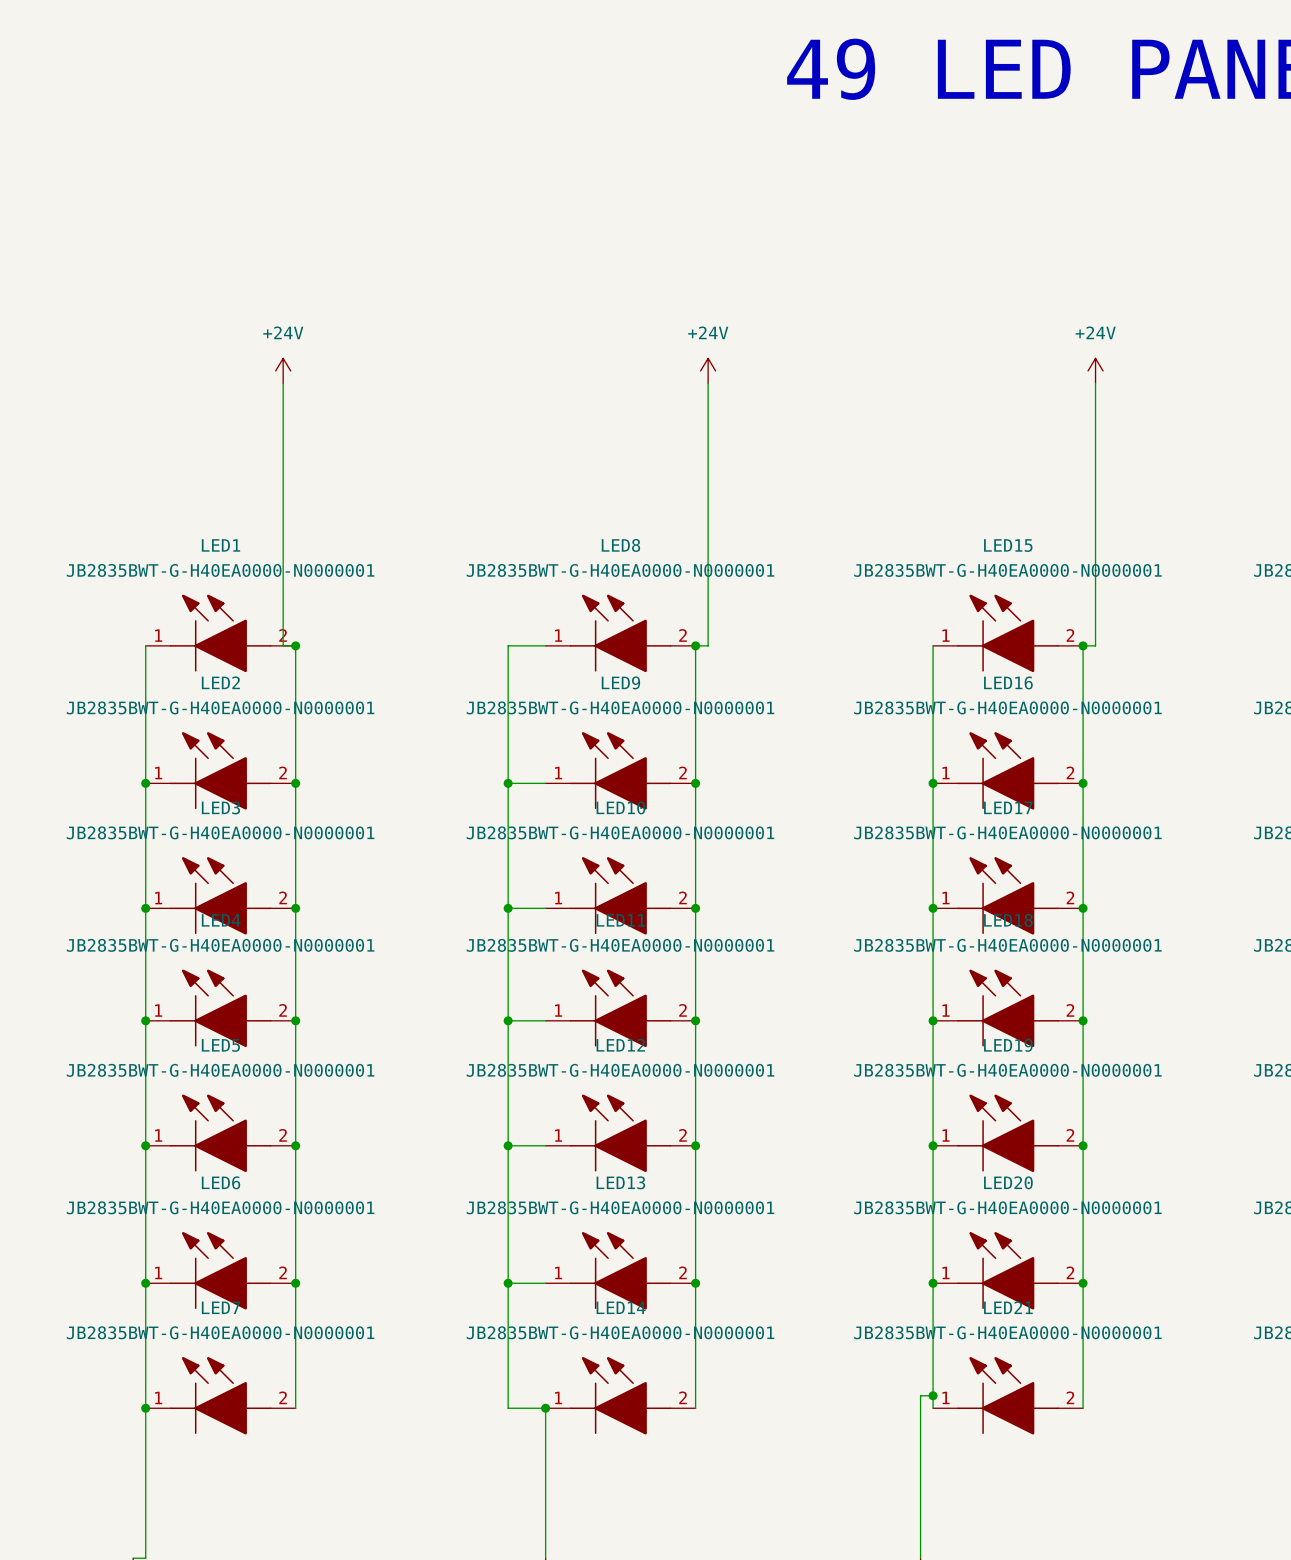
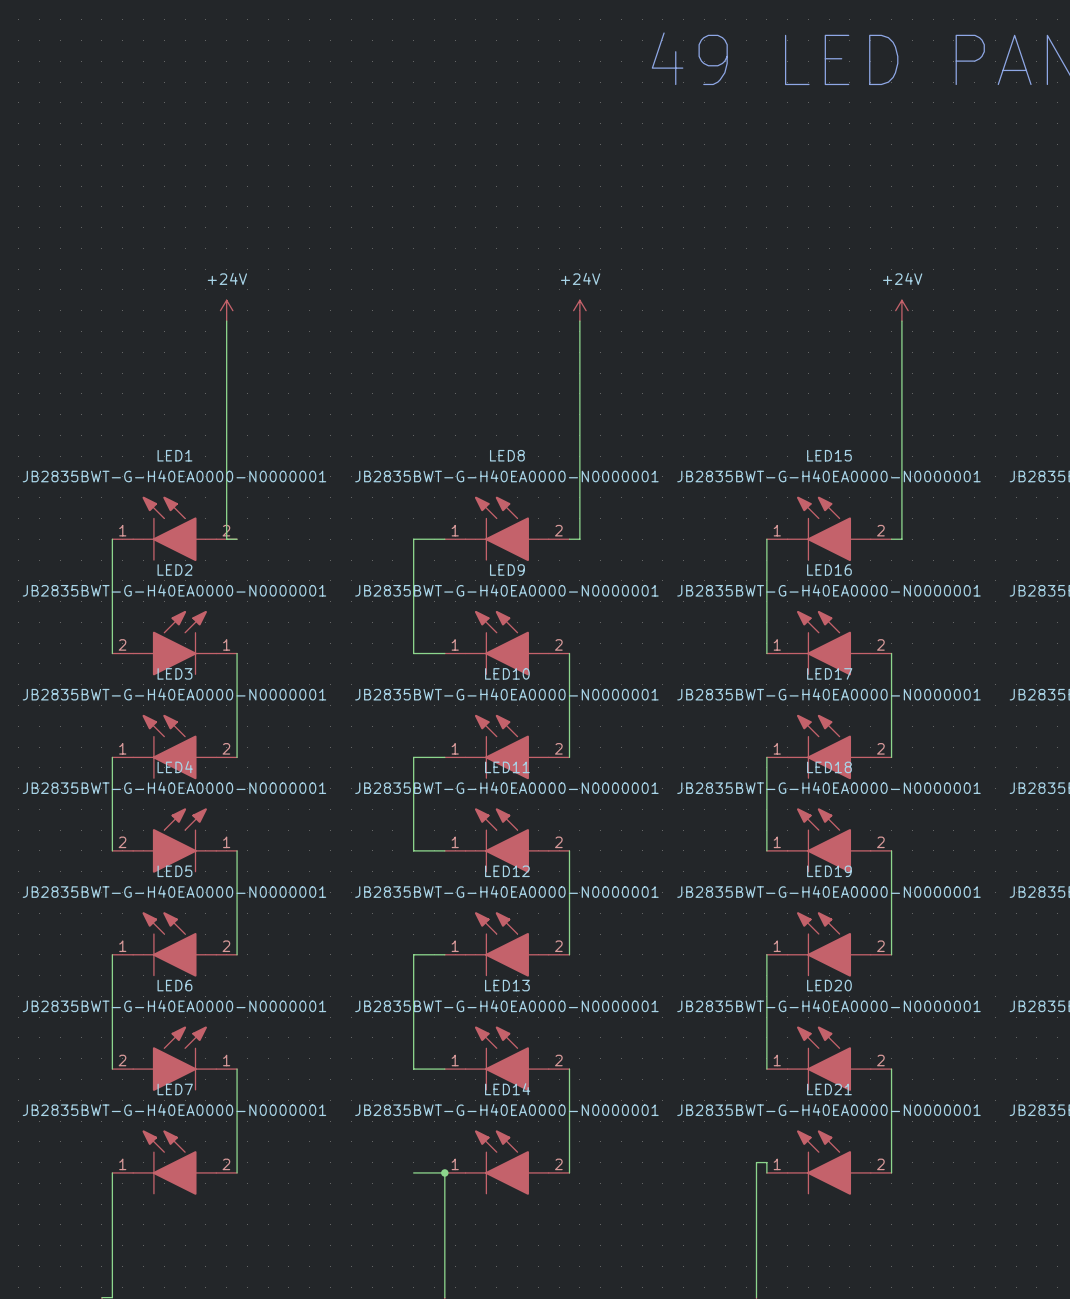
wire: (295, 645) (295, 783) -> none
junction: (295, 645) -> none
wire: (695, 645) (695, 783) -> none
junction: (695, 645) -> none
wire: (1083, 645) (1083, 783) -> none
junction: (1083, 645) -> none
LED2 flip: as is (220, 770) -> left-right (174, 643)
wire: (145, 783) (145, 908) -> none
junction: (145, 783) -> none
junction: (295, 783) -> none
wire: (508, 783) (508, 908) -> none
junction: (508, 783) -> none
junction: (695, 783) -> none
wire: (933, 783) (933, 908) -> none
junction: (933, 783) -> none
junction: (1083, 783) -> none
junction: (145, 908) -> none
wire: (295, 908) (295, 1020) -> none
junction: (295, 908) -> none
junction: (508, 908) -> none
wire: (695, 908) (695, 1020) -> none
junction: (695, 908) -> none
junction: (933, 908) -> none
wire: (1083, 908) (1083, 1020) -> none
junction: (1083, 908) -> none
LED4 flip: as is (220, 1008) -> left-right (174, 840)
wire: (145, 1020) (145, 1145) -> none
junction: (145, 1020) -> none
junction: (295, 1020) -> none
wire: (508, 1020) (508, 1145) -> none
junction: (508, 1020) -> none
junction: (695, 1020) -> none
wire: (933, 1020) (933, 1145) -> none
junction: (933, 1020) -> none
junction: (1083, 1020) -> none
junction: (145, 1145) -> none
wire: (295, 1145) (295, 1283) -> none
junction: (295, 1145) -> none
junction: (508, 1145) -> none
wire: (695, 1145) (695, 1283) -> none
junction: (695, 1145) -> none
junction: (933, 1145) -> none
wire: (1083, 1145) (1083, 1283) -> none
junction: (1083, 1145) -> none
LED6 flip: as is (220, 1270) -> left-right (174, 1058)
wire: (145, 1283) (145, 1408) -> none
junction: (145, 1283) -> none
junction: (295, 1283) -> none
wire: (508, 1283) (508, 1408) -> none
junction: (508, 1283) -> none
junction: (695, 1283) -> none
wire: (933, 1283) (933, 1395) -> none
junction: (933, 1283) -> none
junction: (1083, 1283) -> none
junction: (933, 1395) -> none
junction: (145, 1408) -> none

